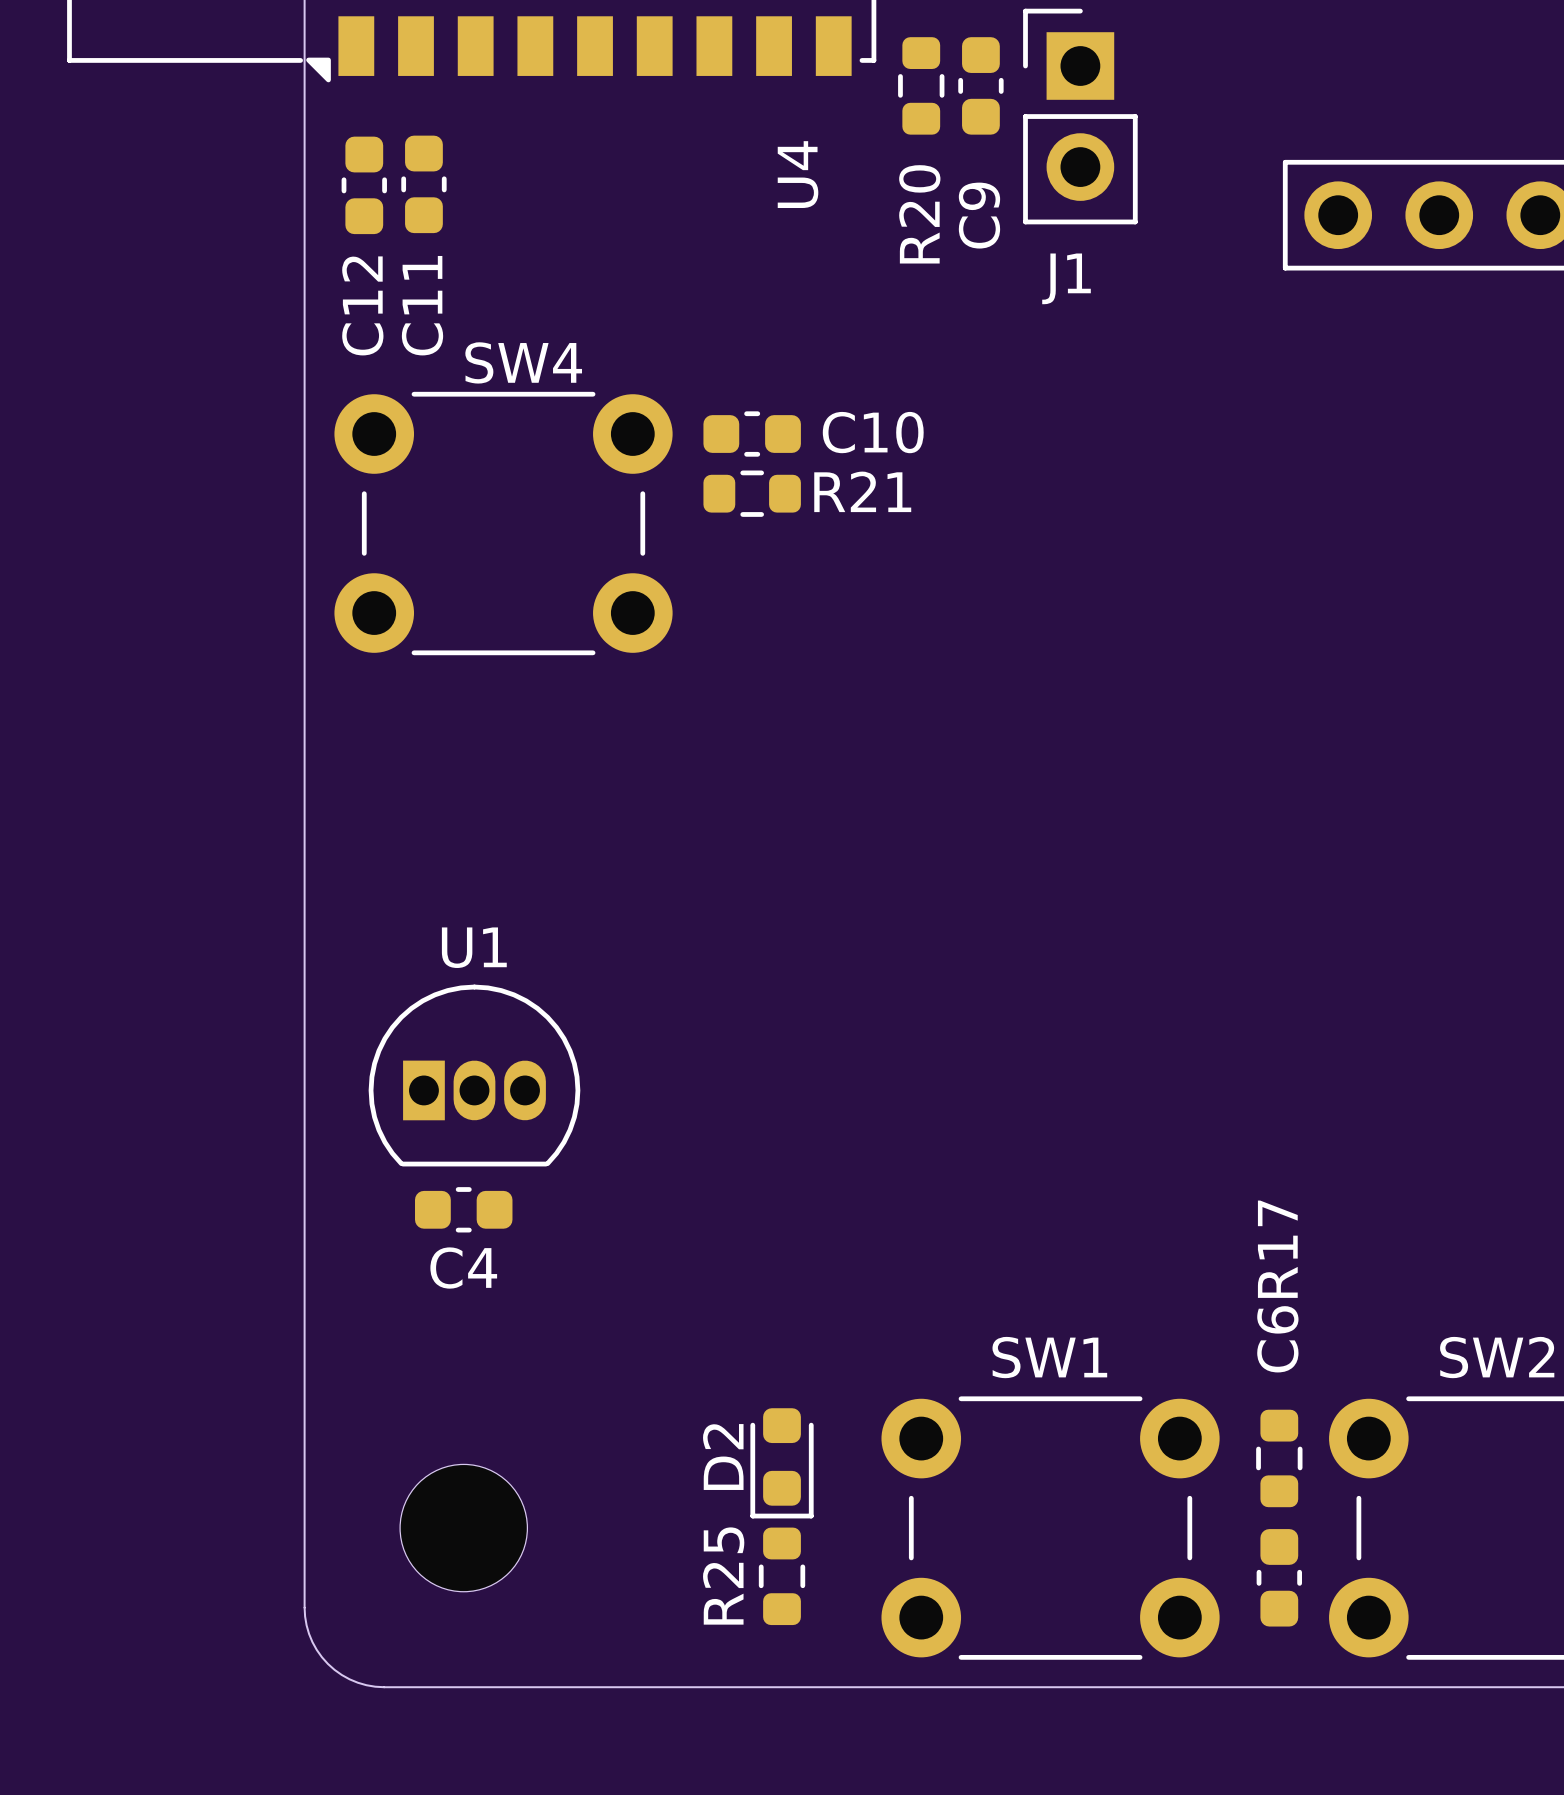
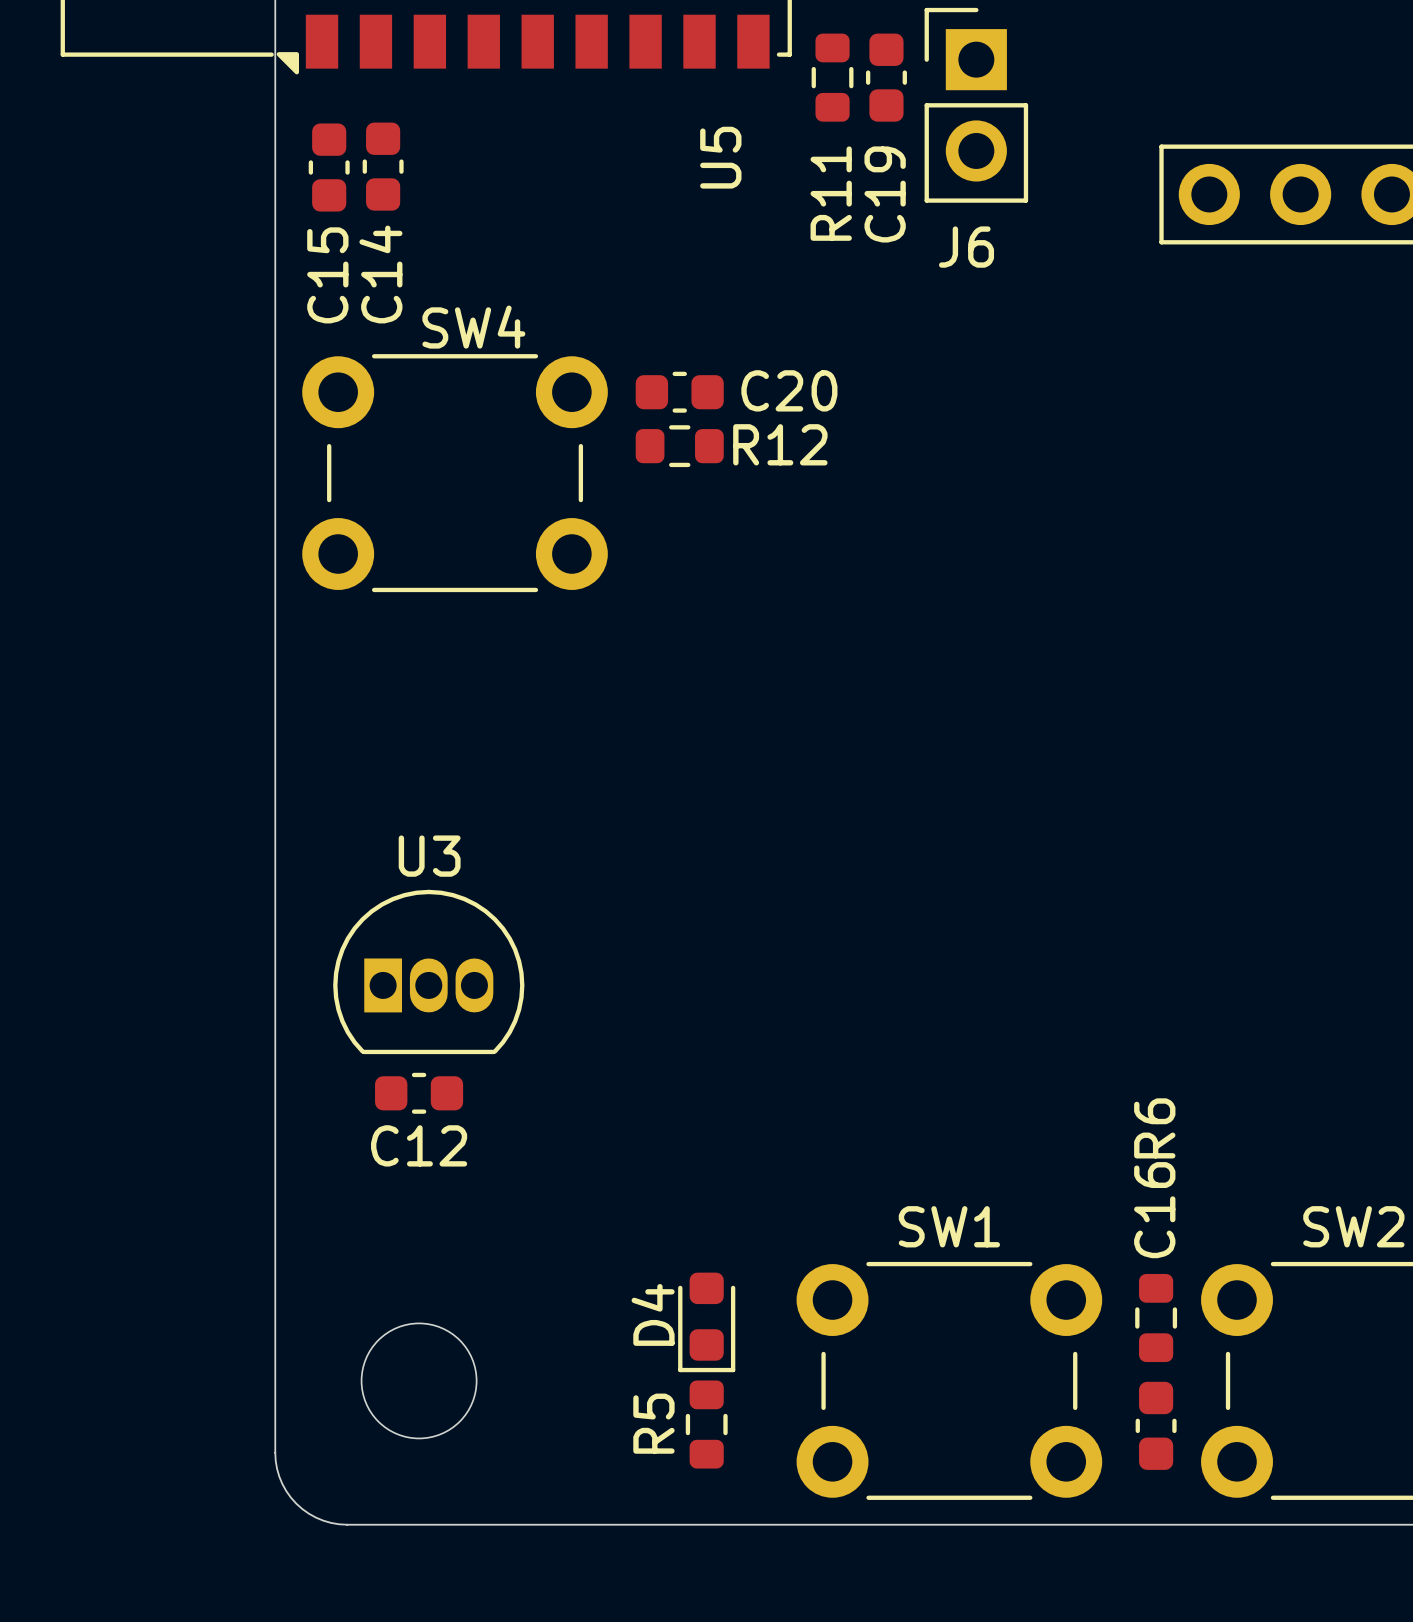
U4 name: U4 (798, 174) -> U5 (720, 157)
R20 name: R20 (919, 214) -> R11 (831, 193)
C9 name: C9 (979, 215) -> C19 (885, 194)
J1 name: J1 (1066, 278) -> J6 (966, 247)
C12 name: C12 (362, 305) -> C15 (327, 275)
C11 name: C11 (422, 305) -> C14 (380, 274)
C10 name: C10 (873, 432) -> C20 (789, 390)
R21 name: R21 (862, 491) -> R12 (780, 444)
U1 name: U1 (474, 947) -> U3 (429, 856)
R17 name: R17 (1277, 1249) -> R6 (1154, 1128)
C4 name: C4 (463, 1268) -> C12 (419, 1145)
C6 name: C6 (1277, 1339) -> C16 (1154, 1210)
D2 name: D2 (723, 1457) -> D4 (653, 1314)
R25 name: R25 (723, 1576) -> R5 (653, 1423)

